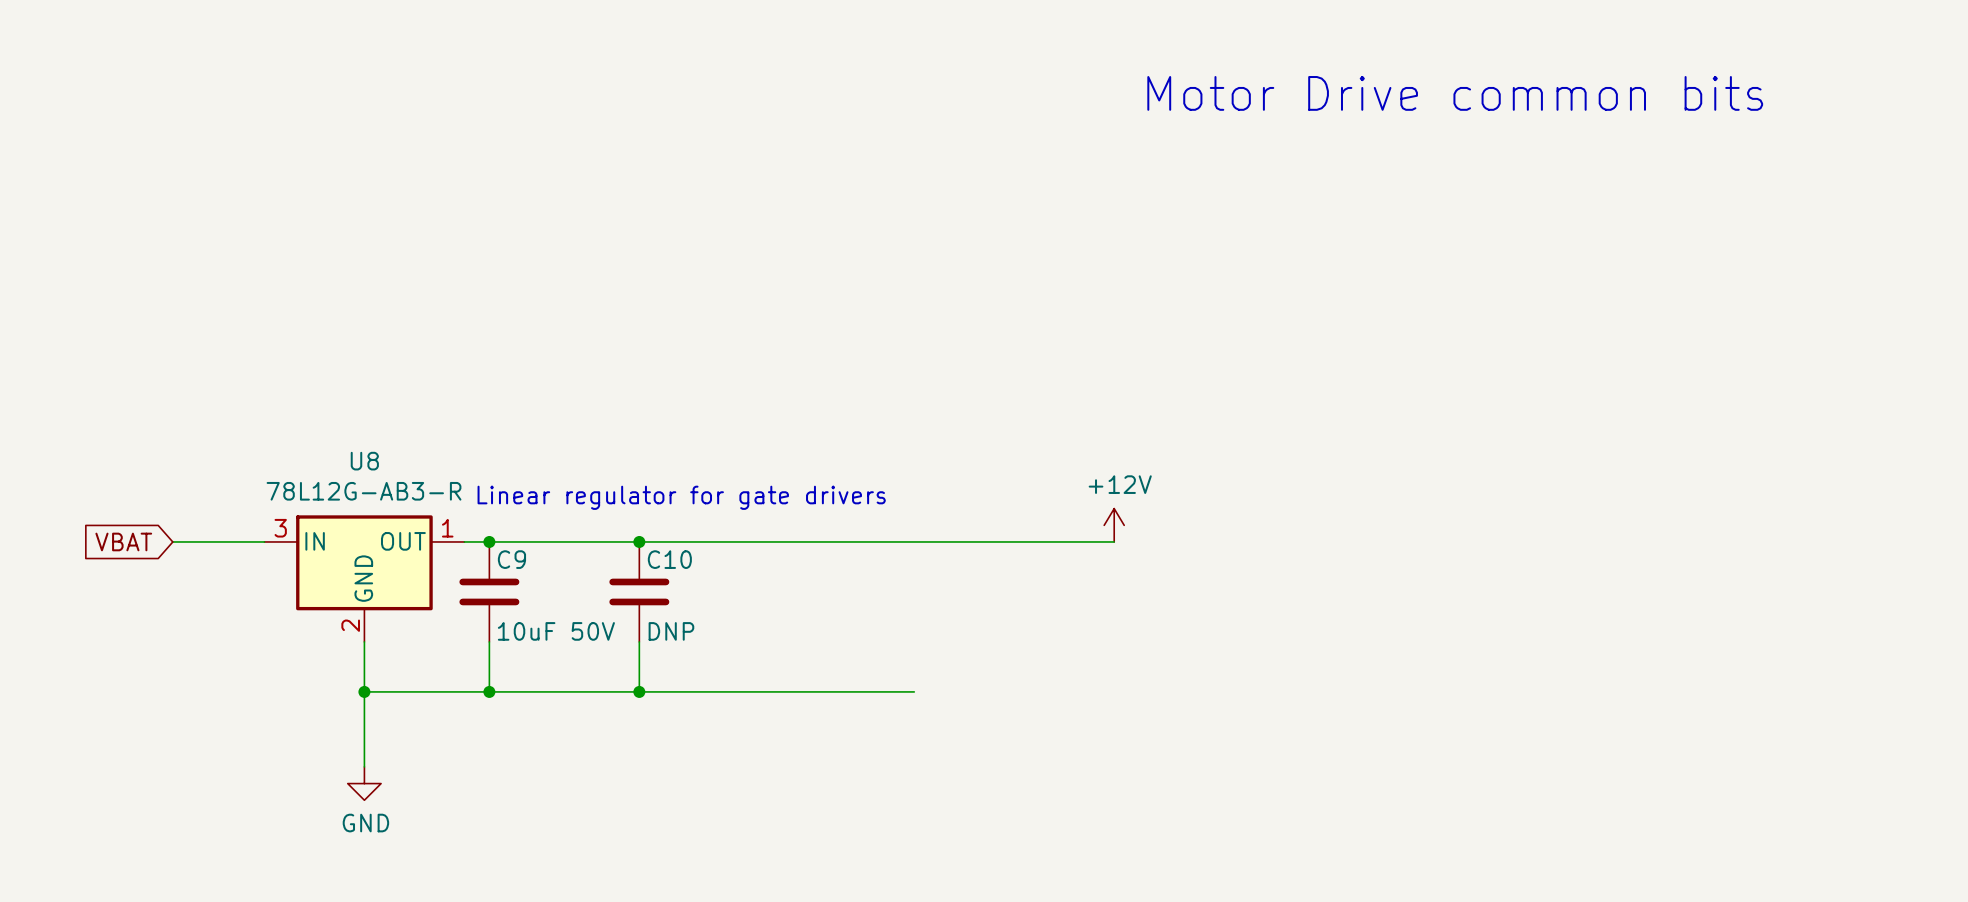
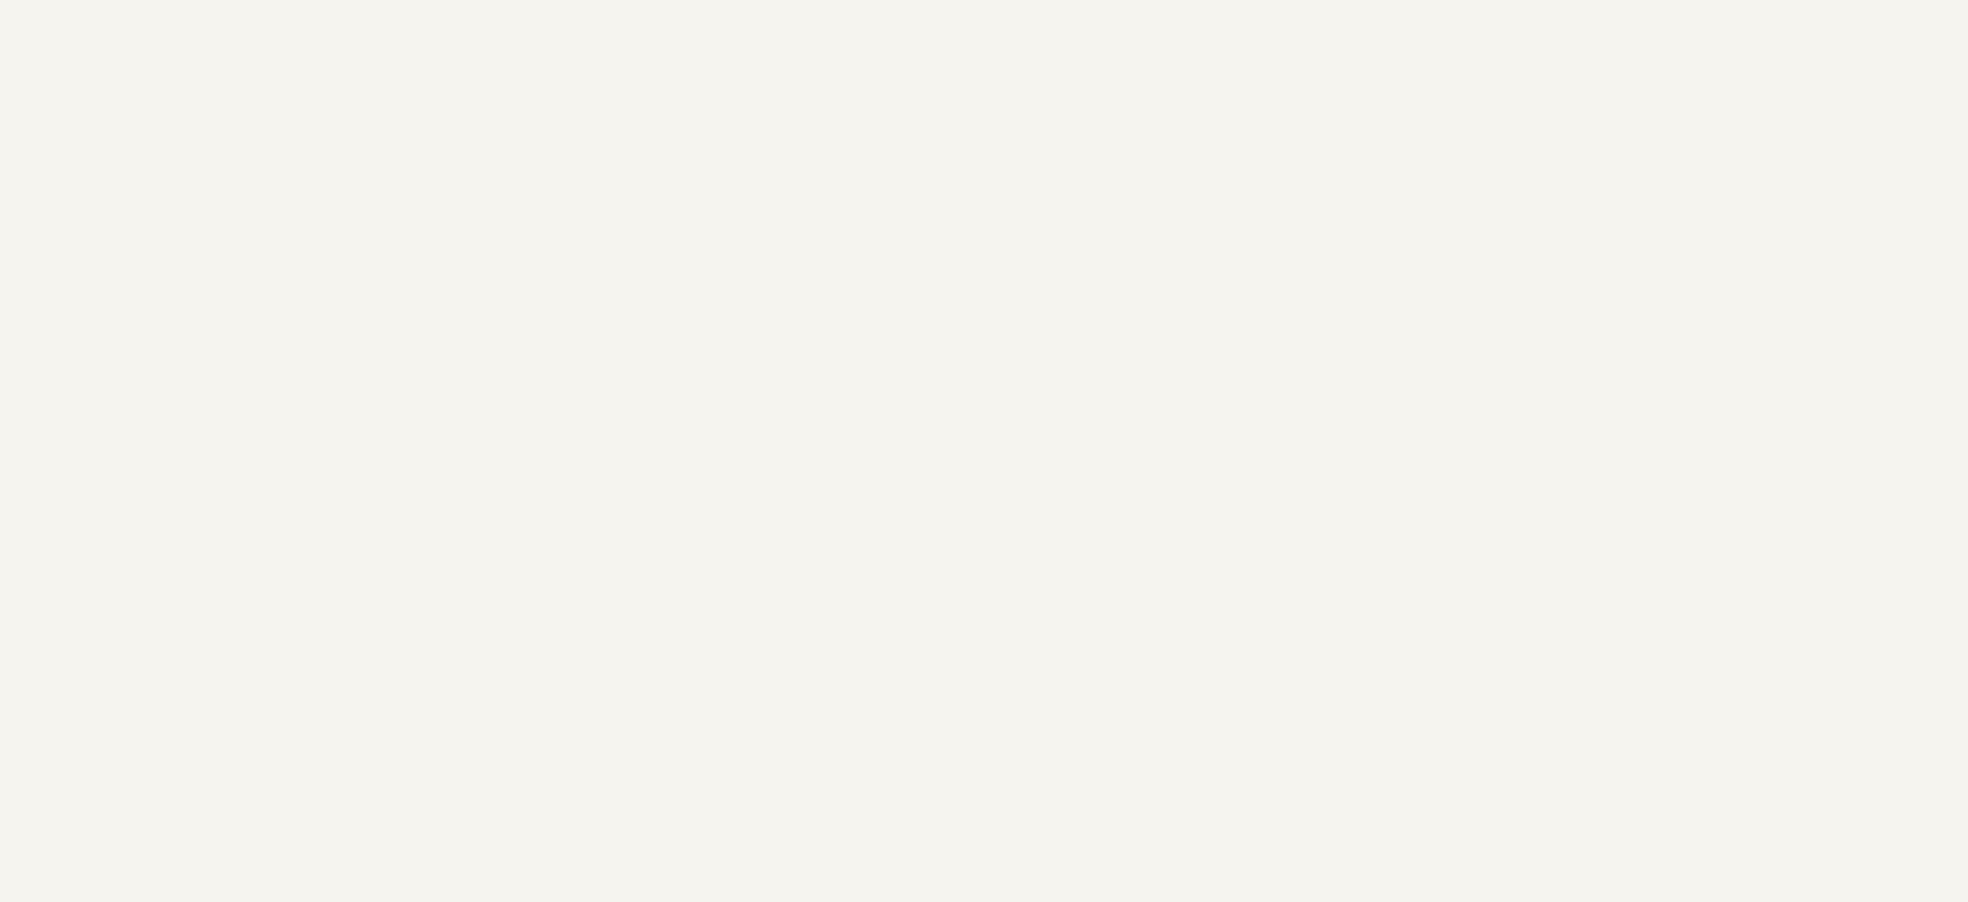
text: Motor Drive common bits (1455, 93) -> none
text: Linear regulator for gate drivers (681, 497) -> none
power symbol: +12V (1114, 525) -> none
global label: VBAT (123, 541) -> none
wire: (172, 541) (264, 541) -> none
wire: (464, 541) (1114, 541) -> none
junction: (489, 541) -> none
junction: (639, 541) -> none
U8: 78L12G-AB3-R (364, 578) -> none
C9: 10uF 50V (489, 591) -> none
C10: DNP (639, 591) -> none
wire: (364, 641) (364, 766) -> none
wire: (489, 641) (489, 691) -> none
wire: (639, 641) (639, 691) -> none
wire: (364, 691) (914, 691) -> none
junction: (364, 691) -> none
junction: (489, 691) -> none
junction: (639, 691) -> none
power symbol: GND (364, 783) -> none

